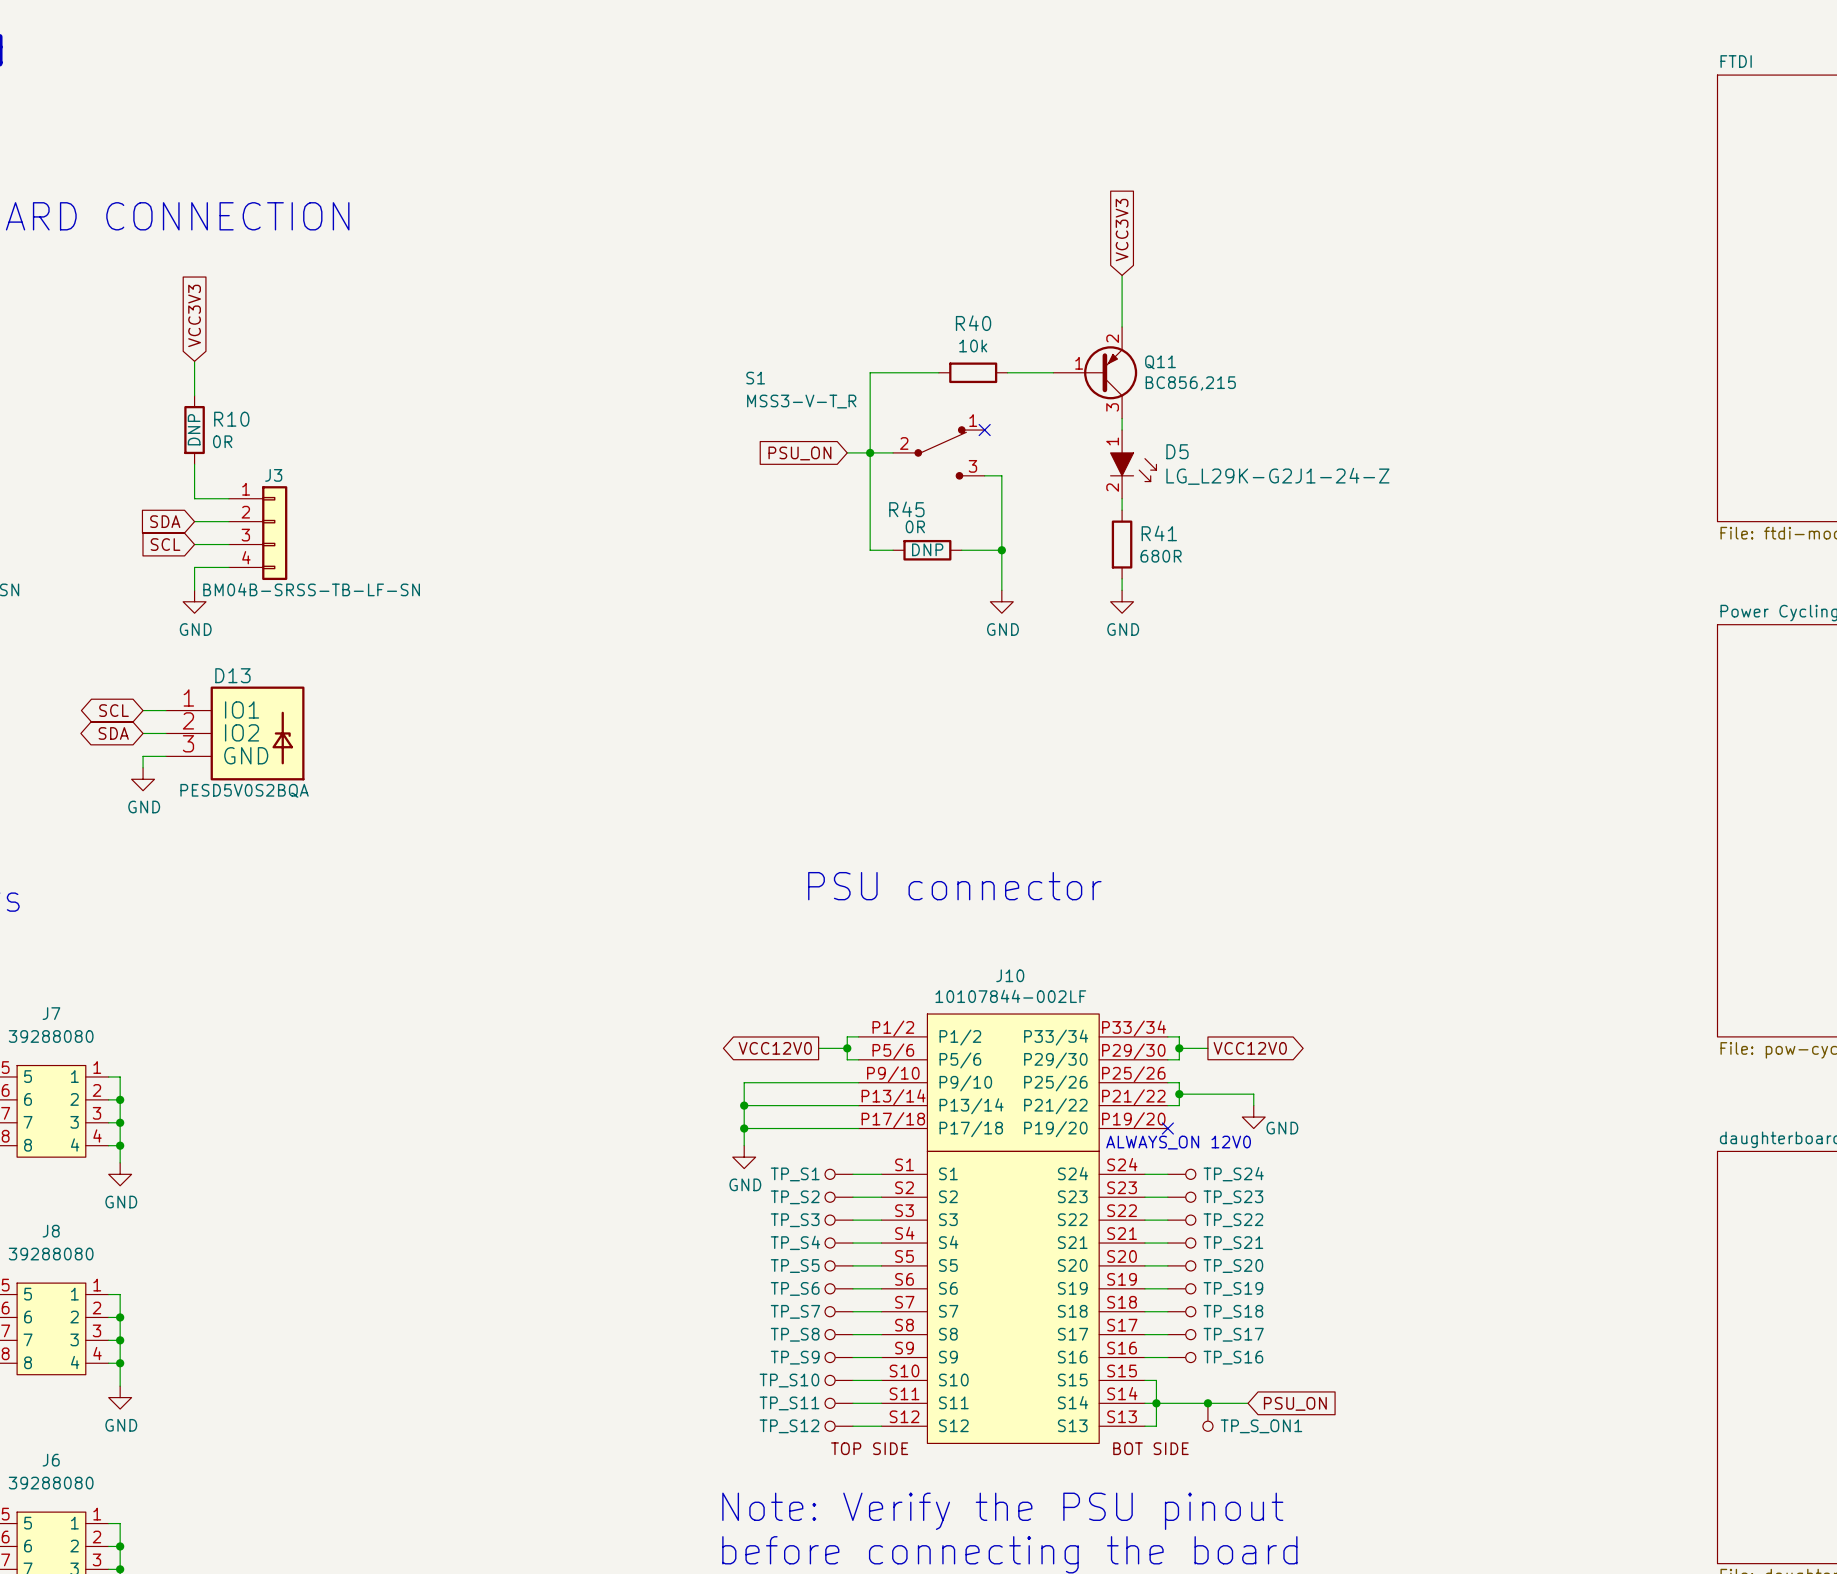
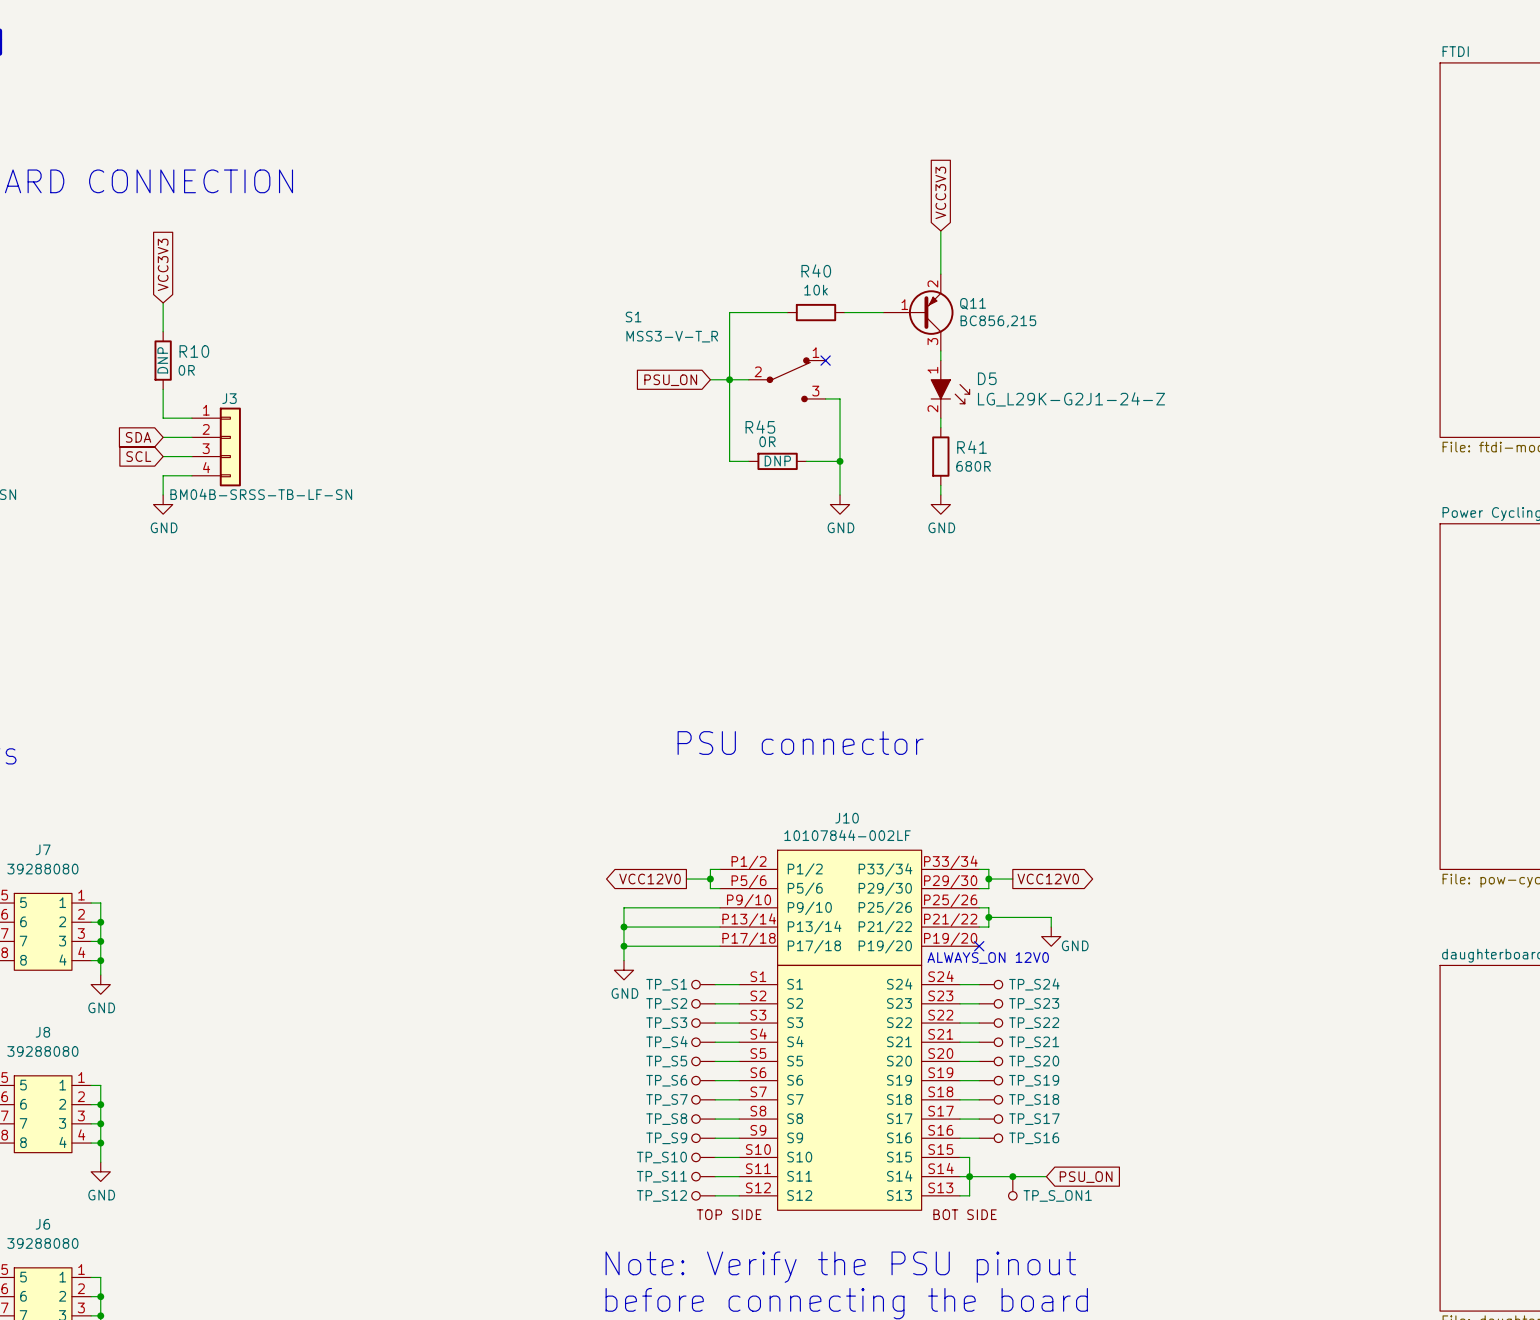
global label: SCL (113, 710) -> none
wire: (143, 710) (165, 710) -> none
global label: SDA (113, 733) -> none
wire: (143, 733) (165, 733) -> none
D13: (235, 733) -> none
wire: (165, 756) (143, 756) (143, 767) -> none
power symbol: GND (143, 779) -> none

